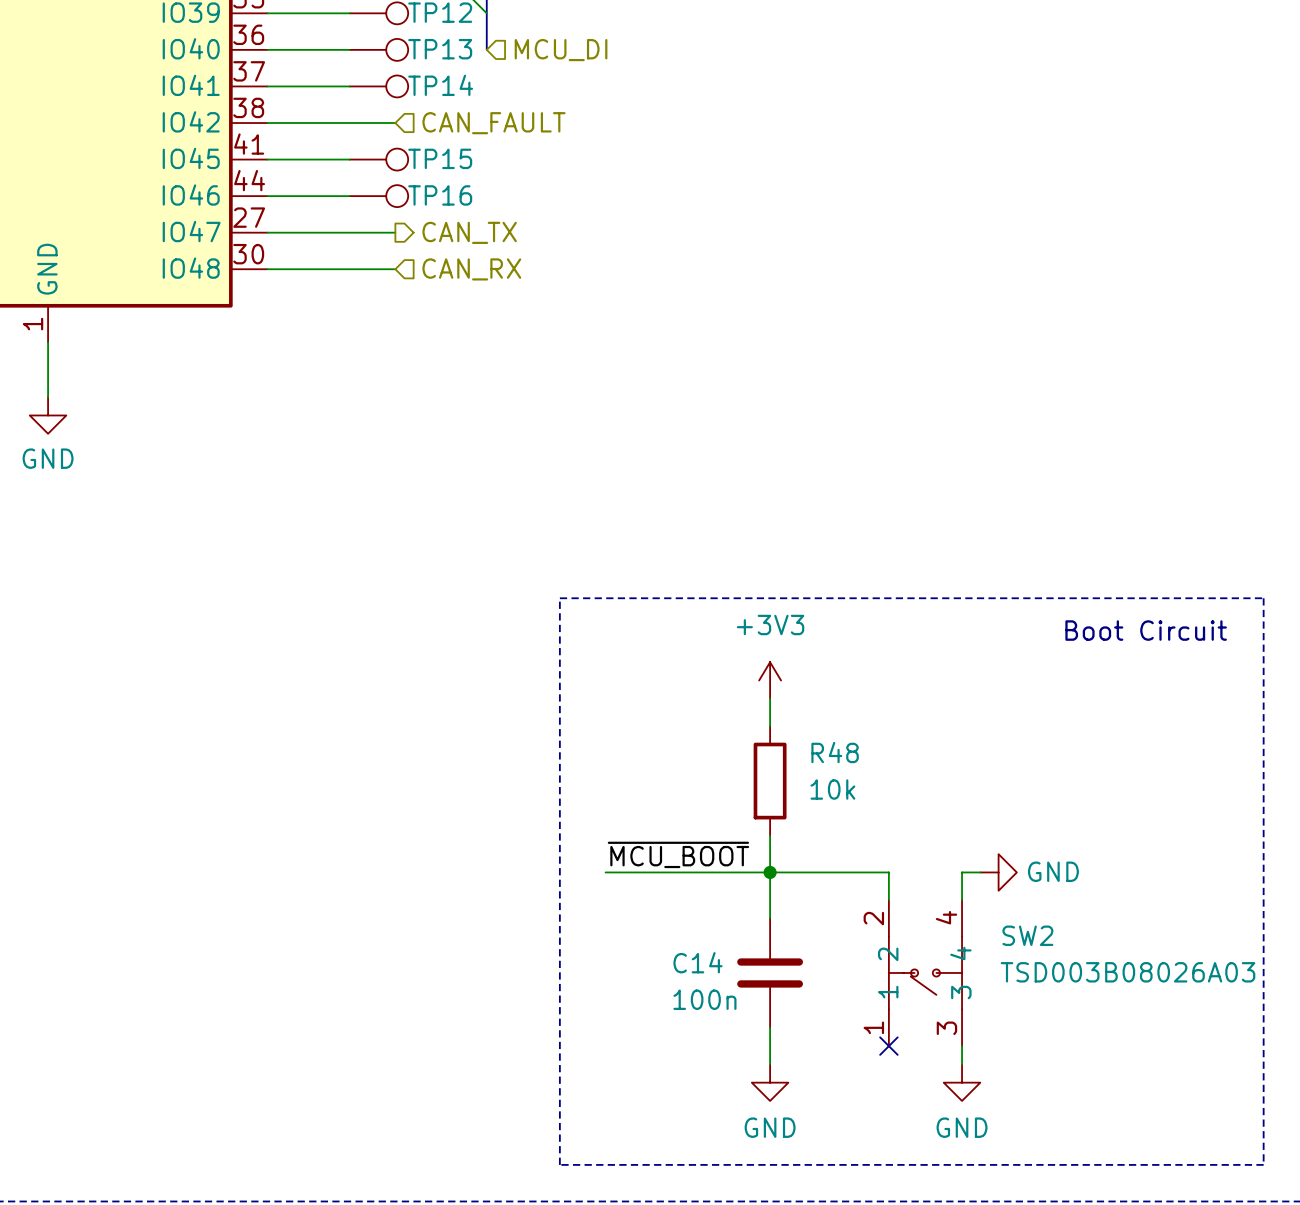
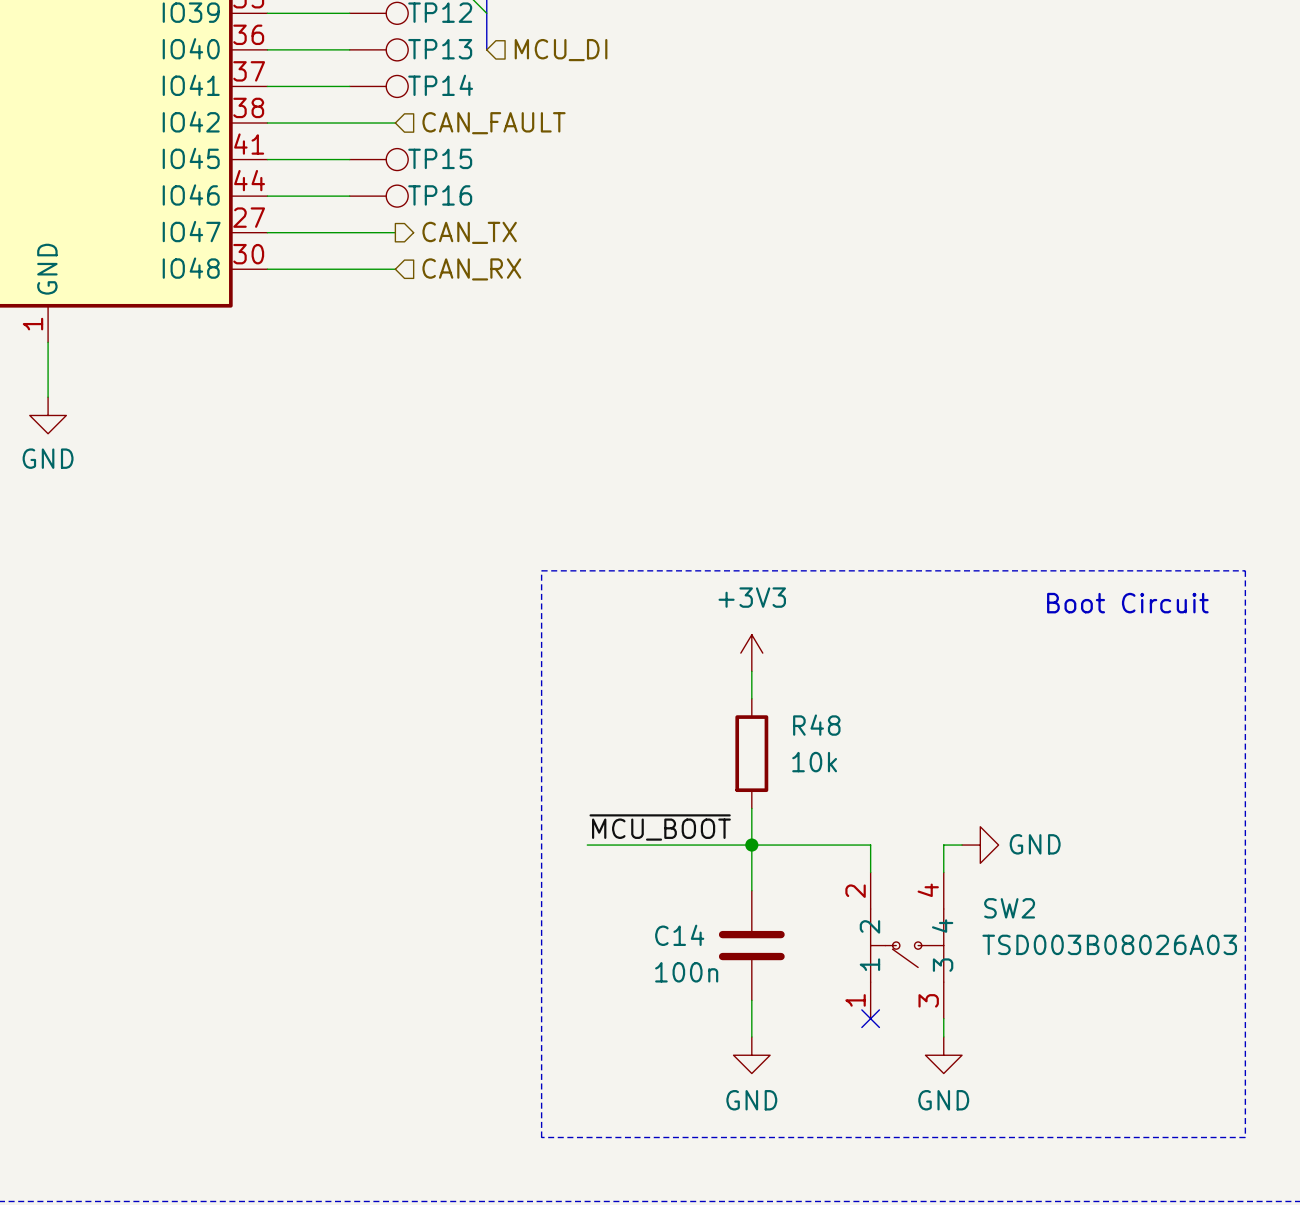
line: (559, 598) (1263, 598) (1263, 1164) (559, 1164) (559, 598) -> (541, 570) (1245, 570) (1245, 1137) (541, 1137) (541, 570)
text position: Boot Circuit (1146, 630) -> Boot Circuit (1127, 603)
power symbol position: +3V3 (770, 680) -> +3V3 (751, 653)
wire: (770, 698) (770, 726) -> (751, 671) (751, 698)
R48 position: (770, 781) -> (751, 753)
wire: (770, 835) (770, 918) -> (751, 808) (751, 890)
label position: ~{MCU_BOOT} (678, 854) -> ~{MCU_BOOT} (660, 827)
wire: (605, 872) (888, 872) (888, 899) -> (587, 845) (870, 845) (870, 872)
junction position: (770, 872) -> (751, 845)
wire: (980, 872) (962, 872) (962, 899) -> (962, 845) (943, 845) (943, 872)
power symbol position: GND (998, 872) -> GND (980, 845)
C14 position: (770, 972) -> (751, 945)
SW2 position: (925, 972) -> (907, 945)
wire: (770, 1027) (770, 1064) -> (751, 1000) (751, 1036)
no-connect mark position: (888, 1046) -> (870, 1018)
wire: (962, 1046) (962, 1064) -> (943, 1018) (943, 1036)
power symbol position: GND (770, 1082) -> GND (751, 1055)
power symbol position: GND (962, 1082) -> GND (943, 1055)

